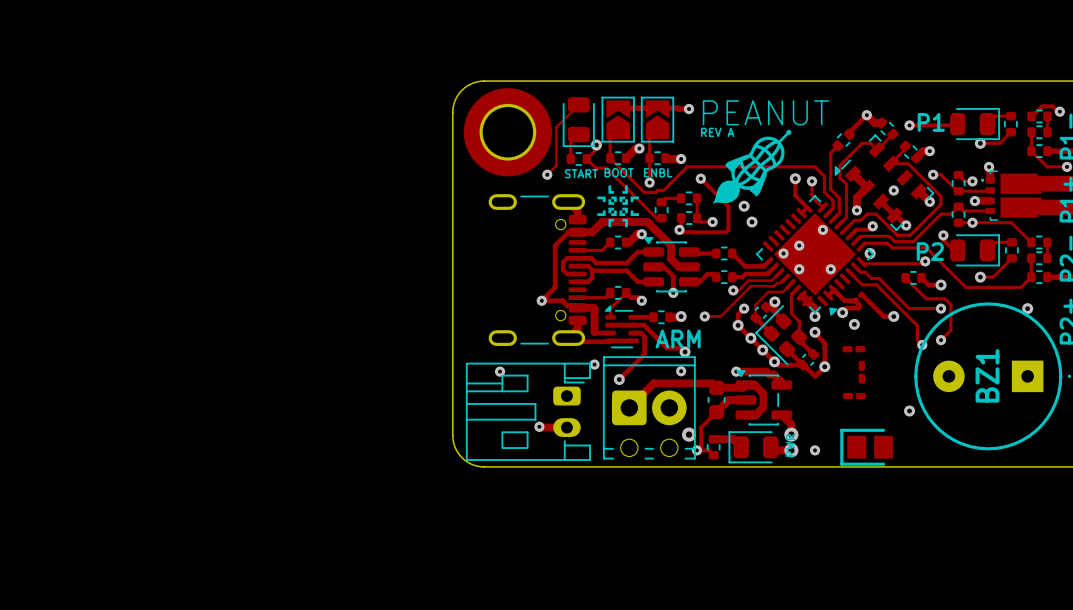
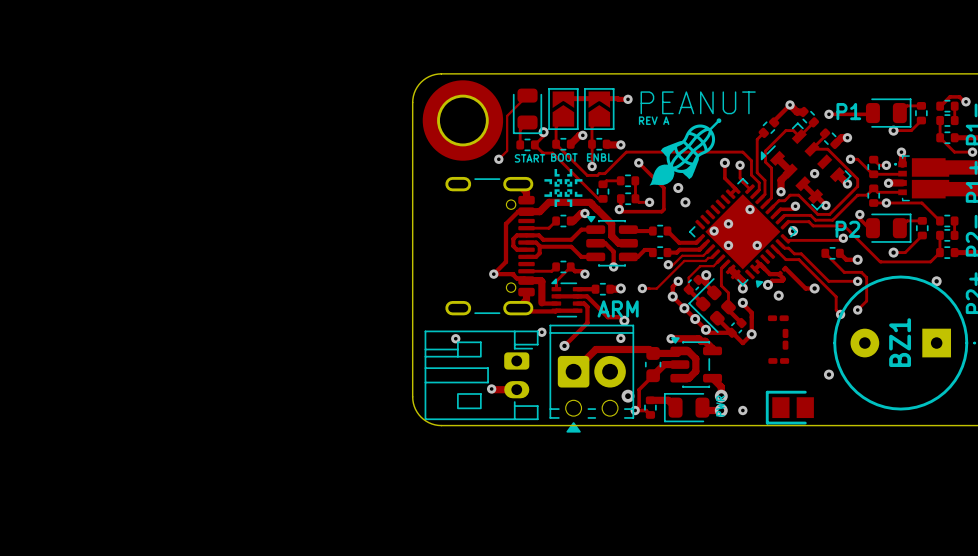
part footprint: [602, 356, 696, 460] -> [549, 324, 635, 433]

